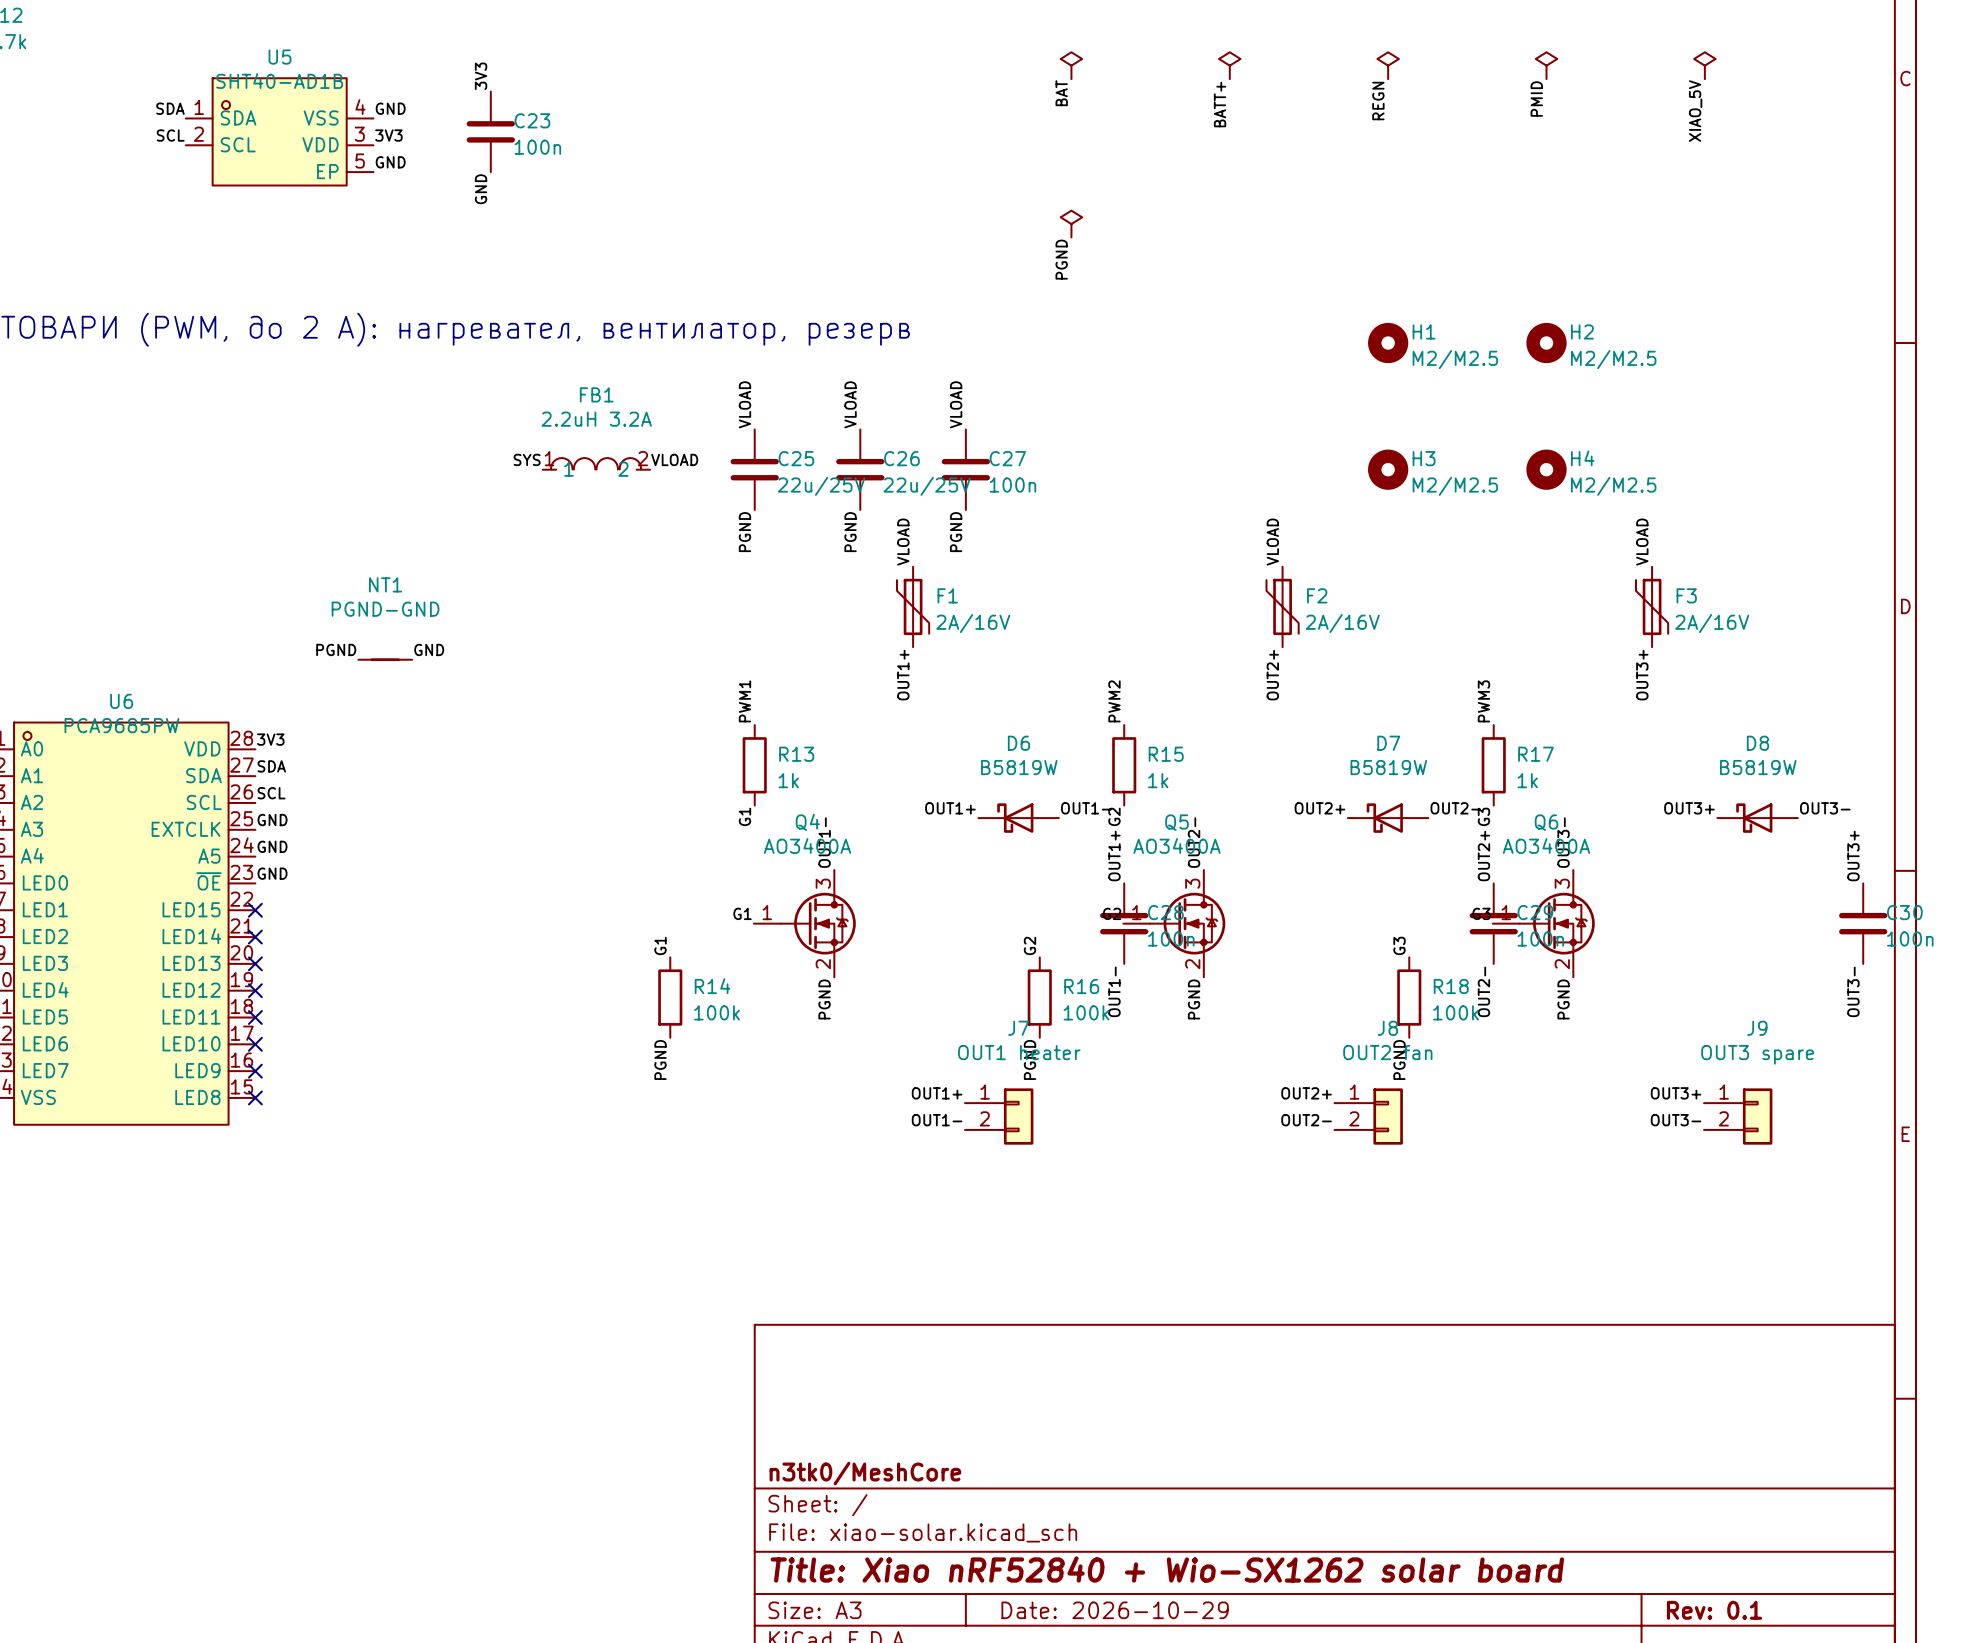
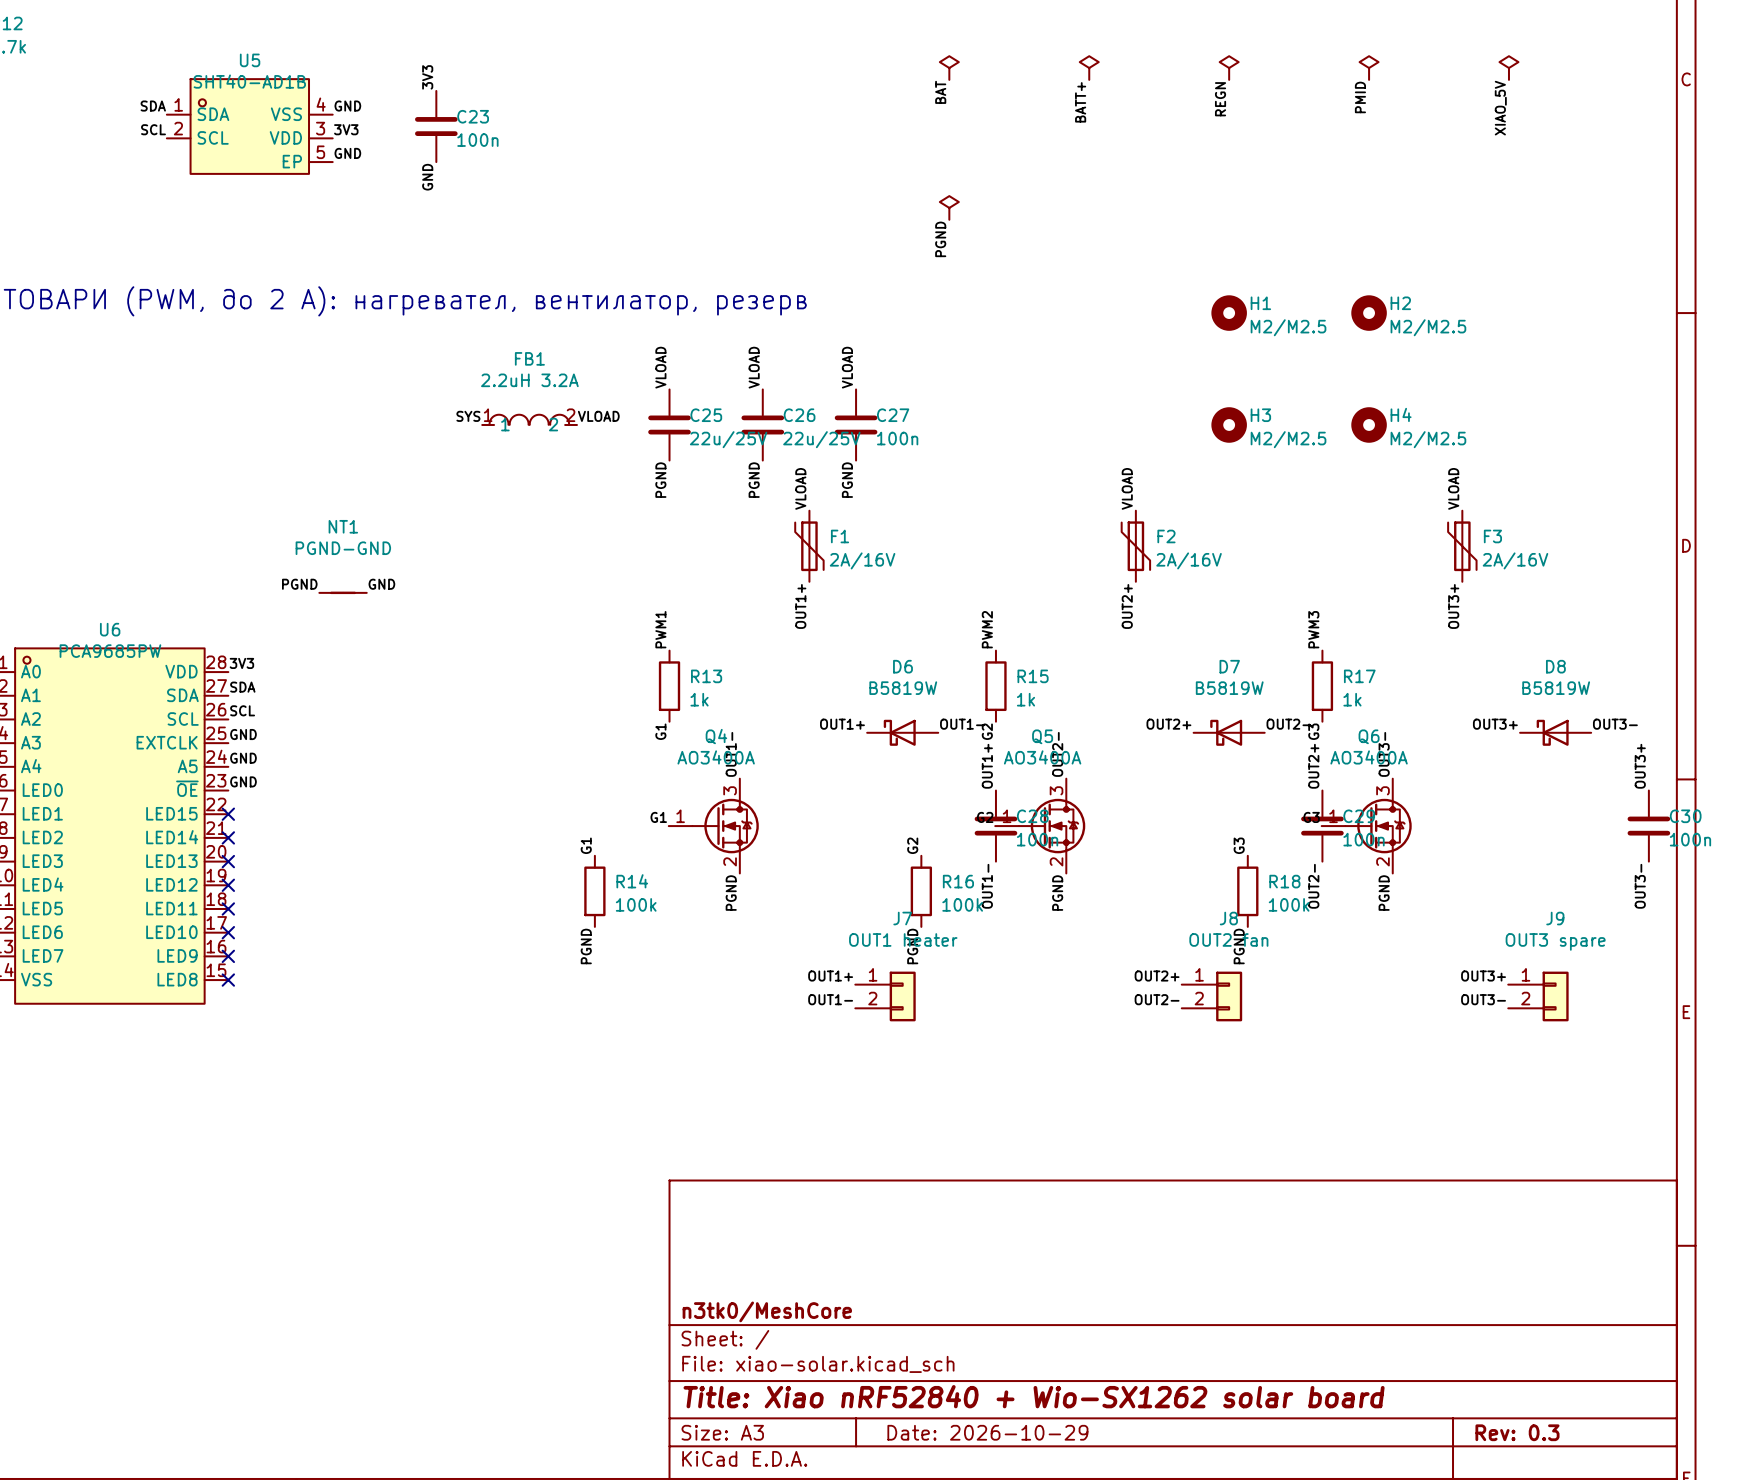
title block: Rev: 0.1 (1714, 1610) -> Rev: 0.3 (1517, 1432)

